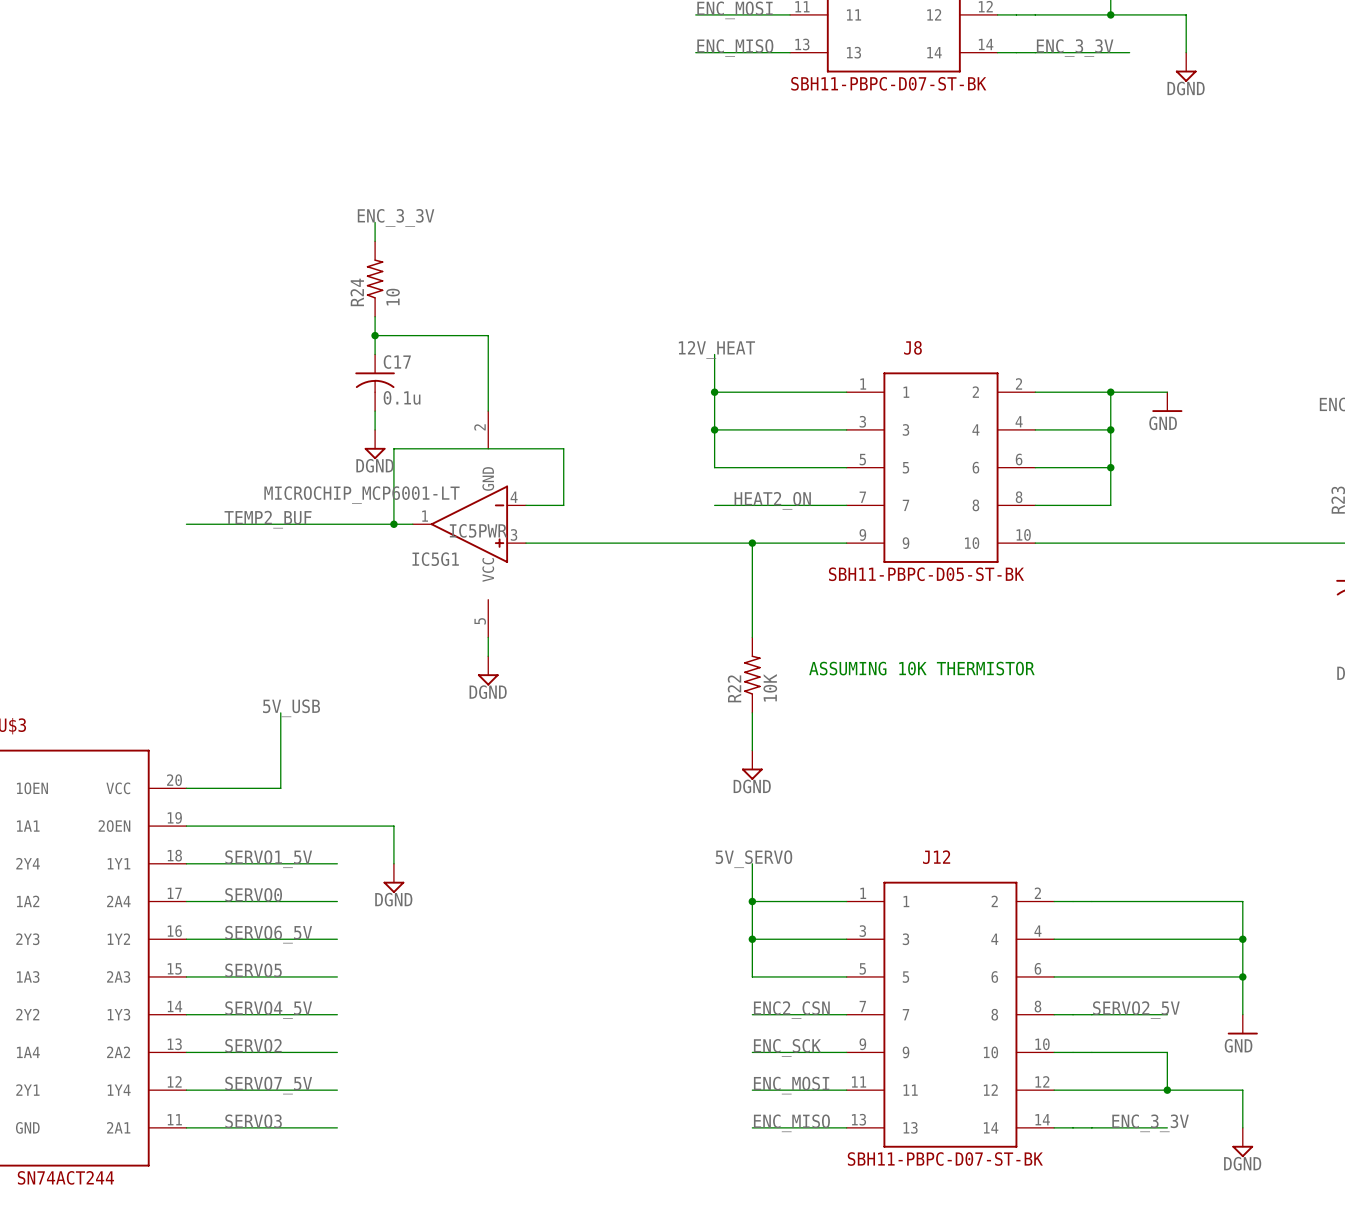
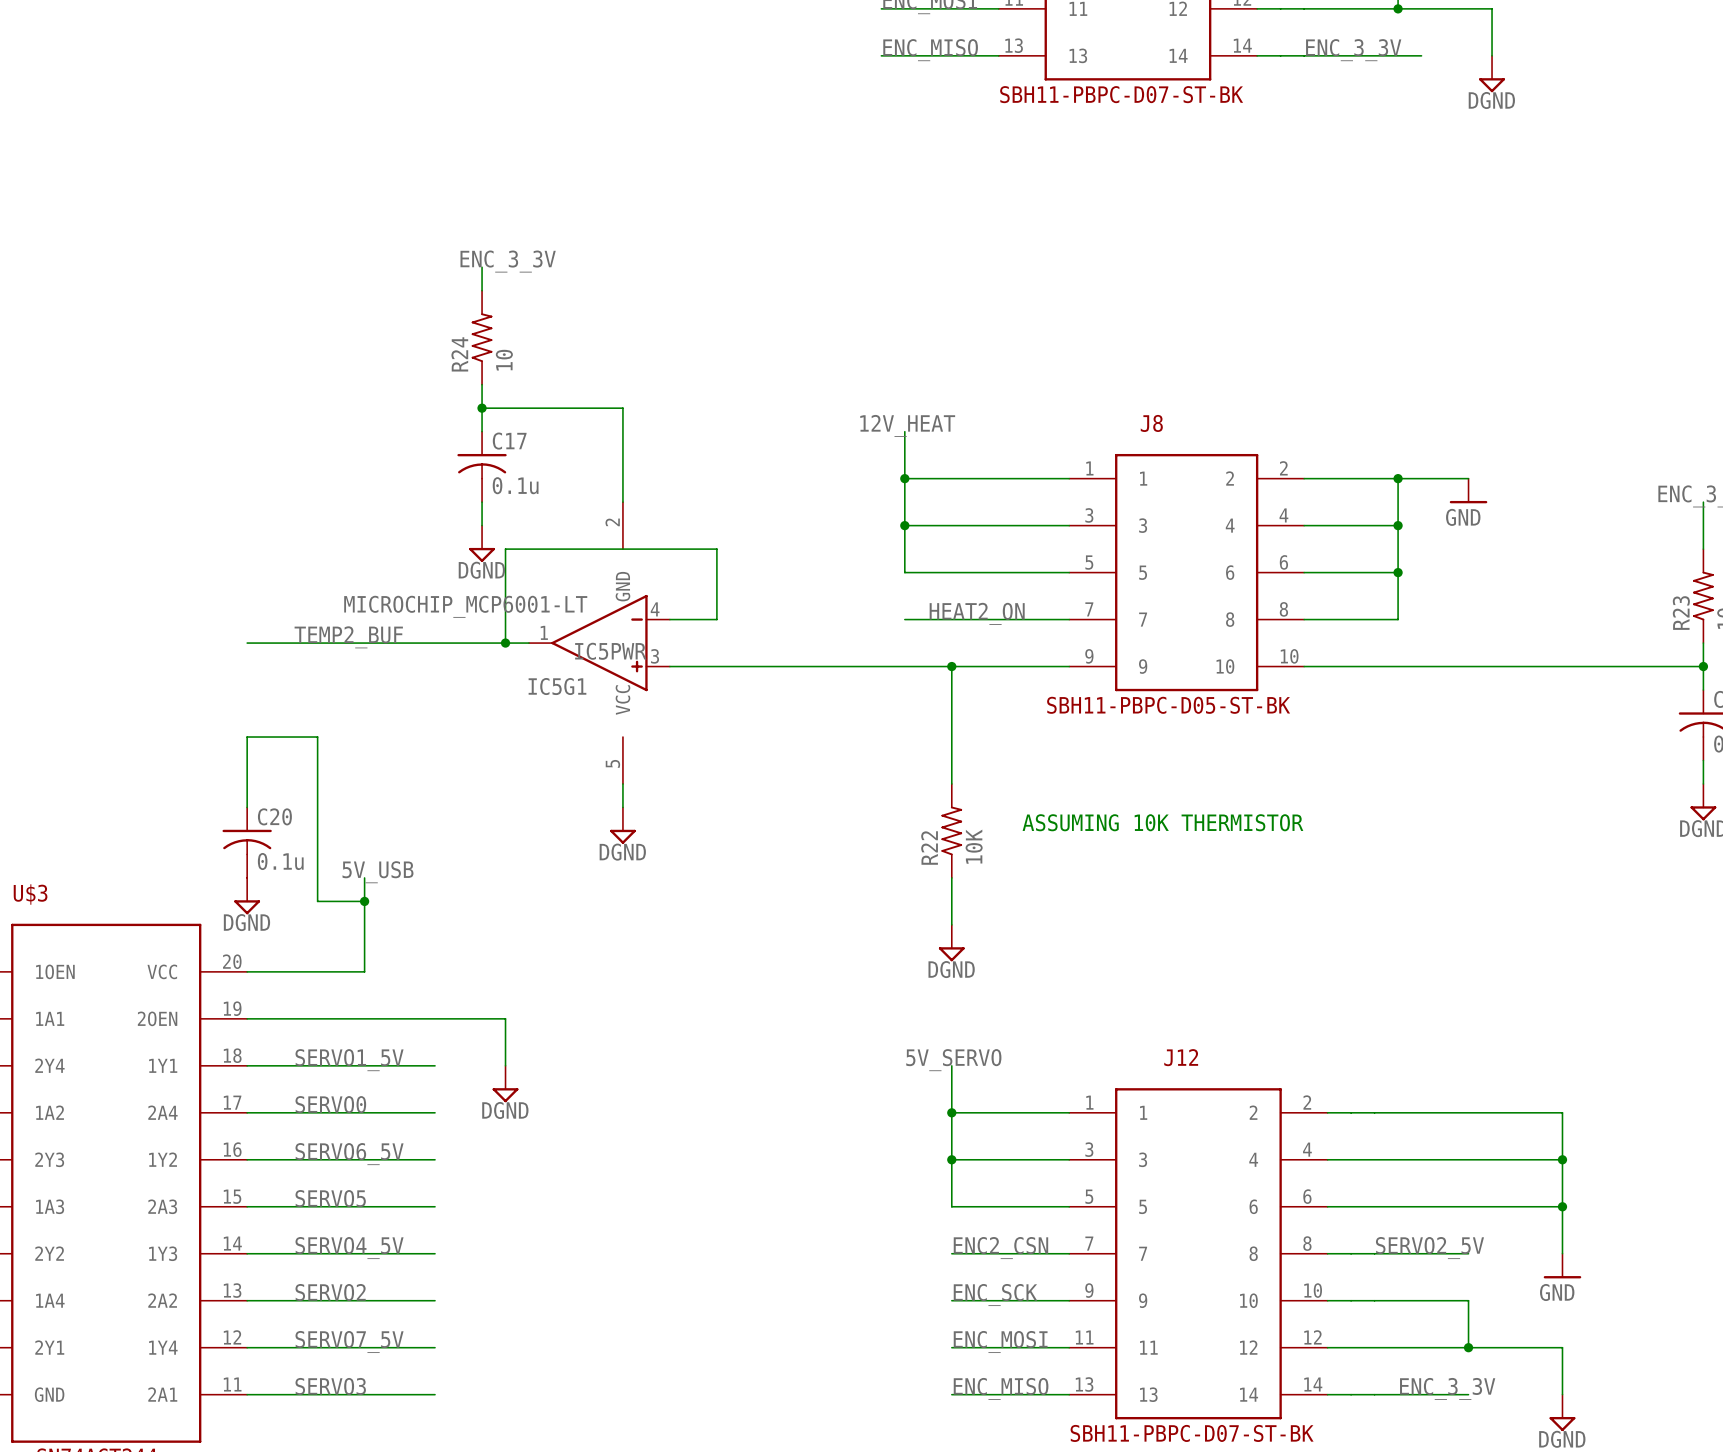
wire: none -> (247, 807) (247, 737) (317, 737) (317, 901) (364, 901)
C20: none -> 0.1u (247, 842)
power symbol: none -> DGND (247, 896)
junction: none -> (364, 901)

